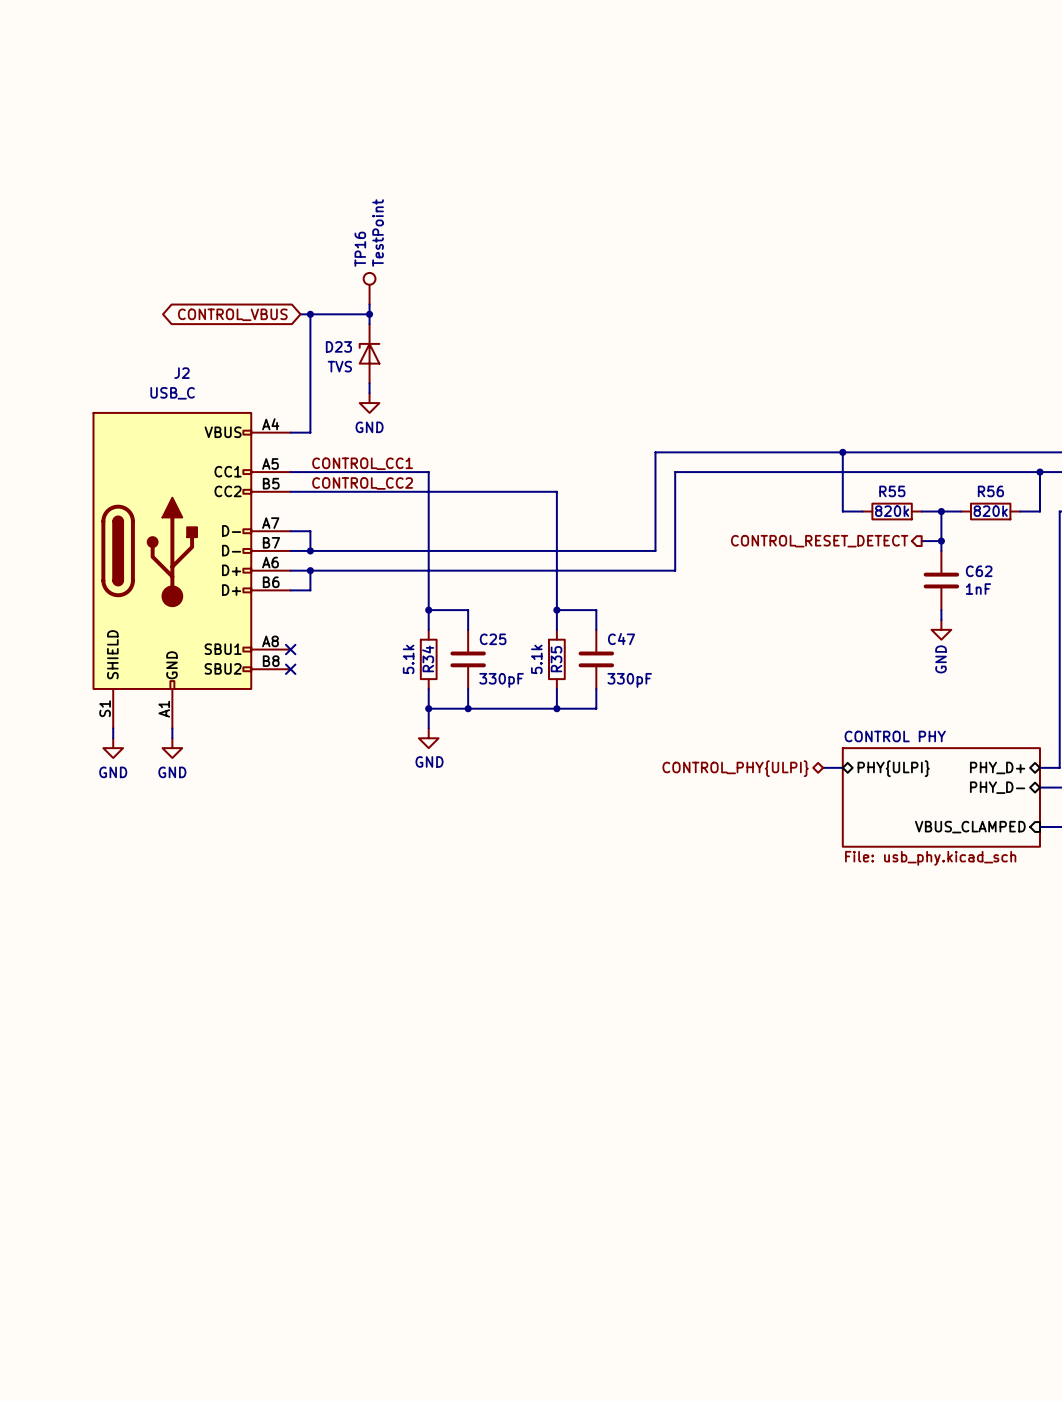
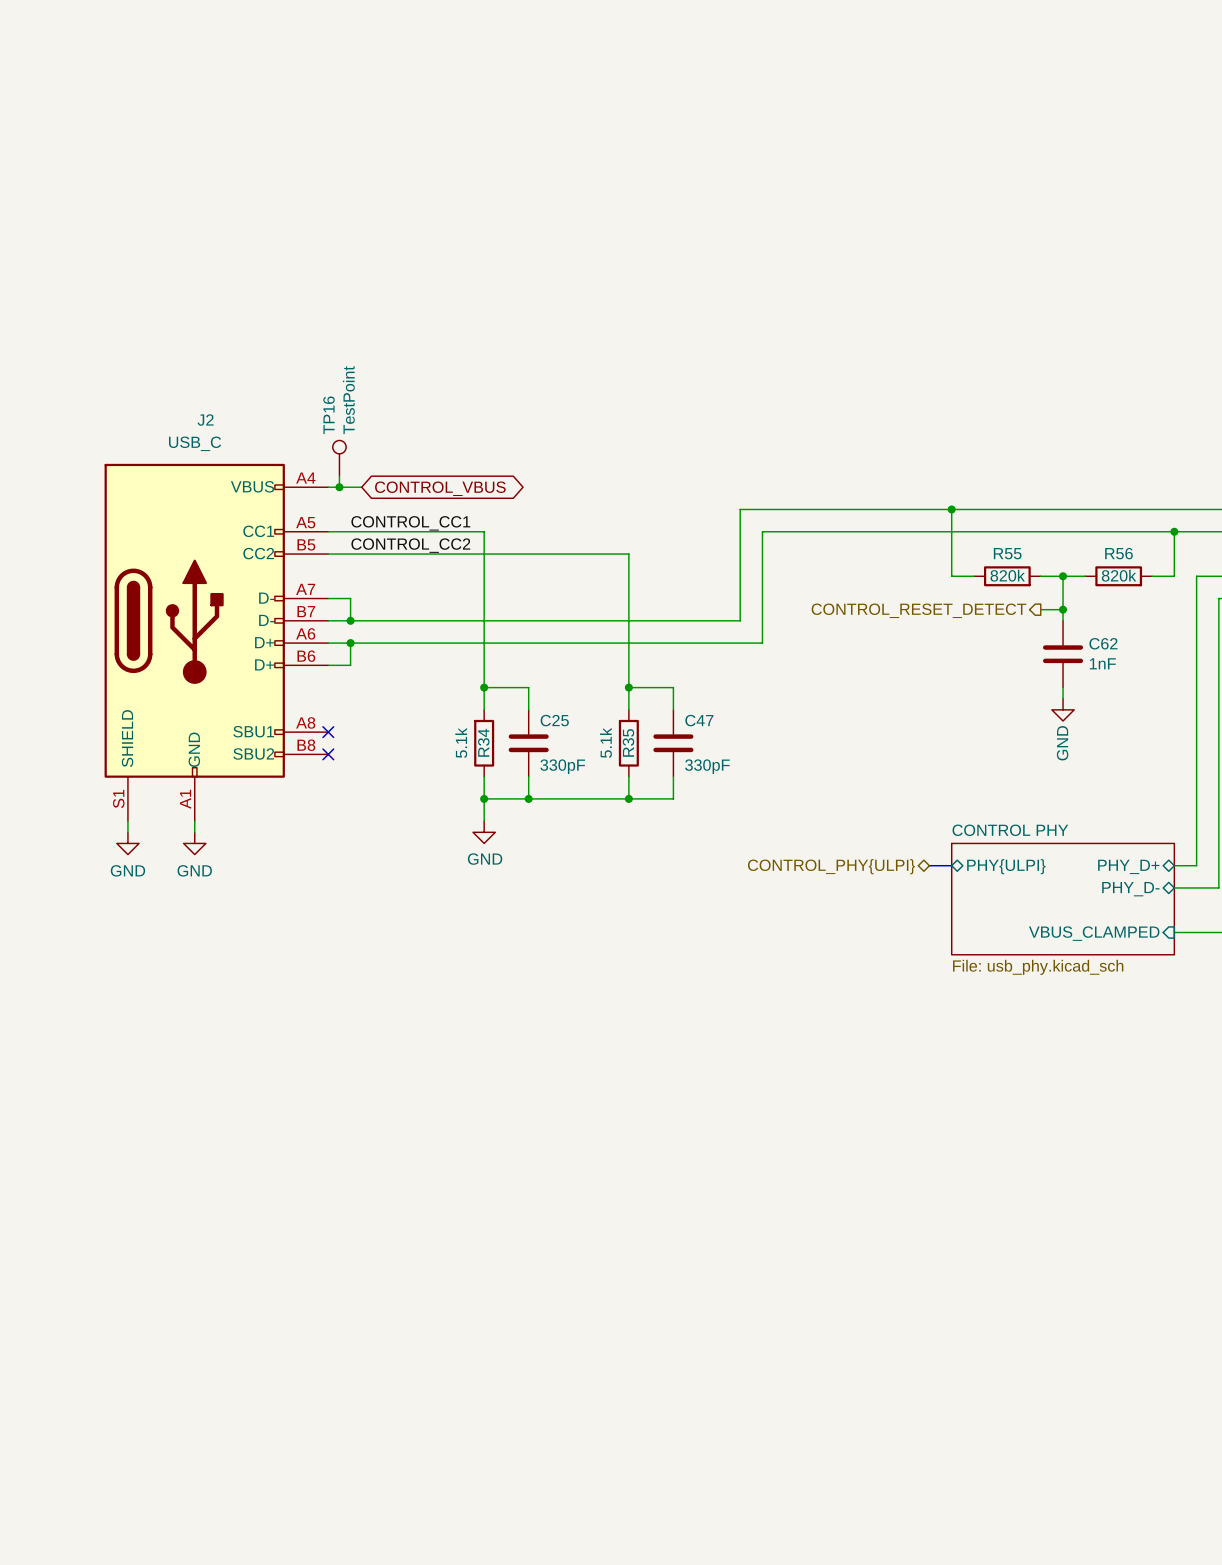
TP16 position: (369, 288) -> (339, 458)
wire: (369, 304) (369, 324) -> none
global label rotation: 0° (232, 314) -> 180° (440, 488)
global label position: CONTROL_VBUS (232, 314) -> CONTROL_VBUS (440, 488)
wire: (300, 314) (369, 314) -> none
wire: (310, 314) (310, 432) -> (361, 487) (350, 487)
junction: (310, 314) -> none
junction: (369, 314) -> none
D23: TVS (369, 353) -> none
wire: (369, 383) (369, 393) -> (339, 476) (339, 487)
power symbol: GND (369, 403) -> none
junction: none -> (339, 487)

